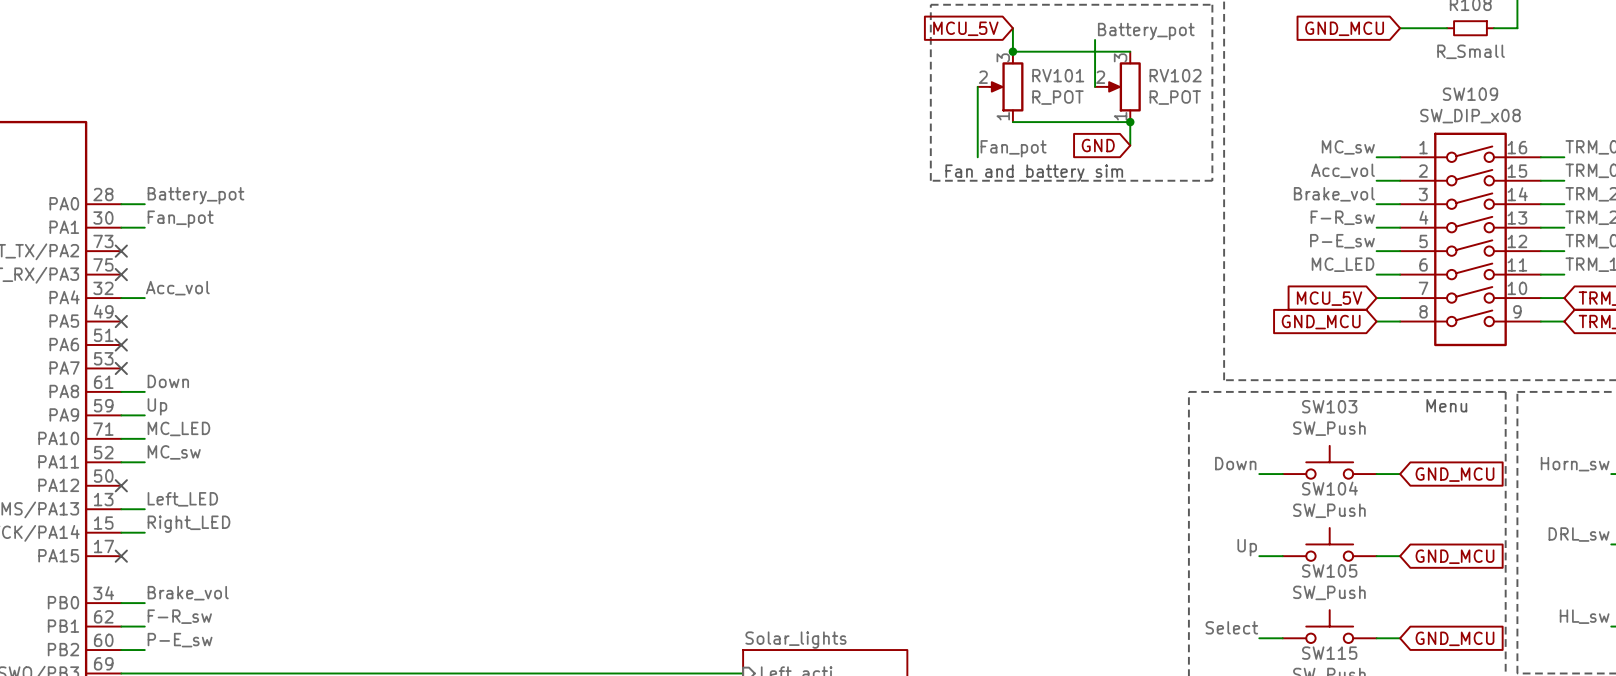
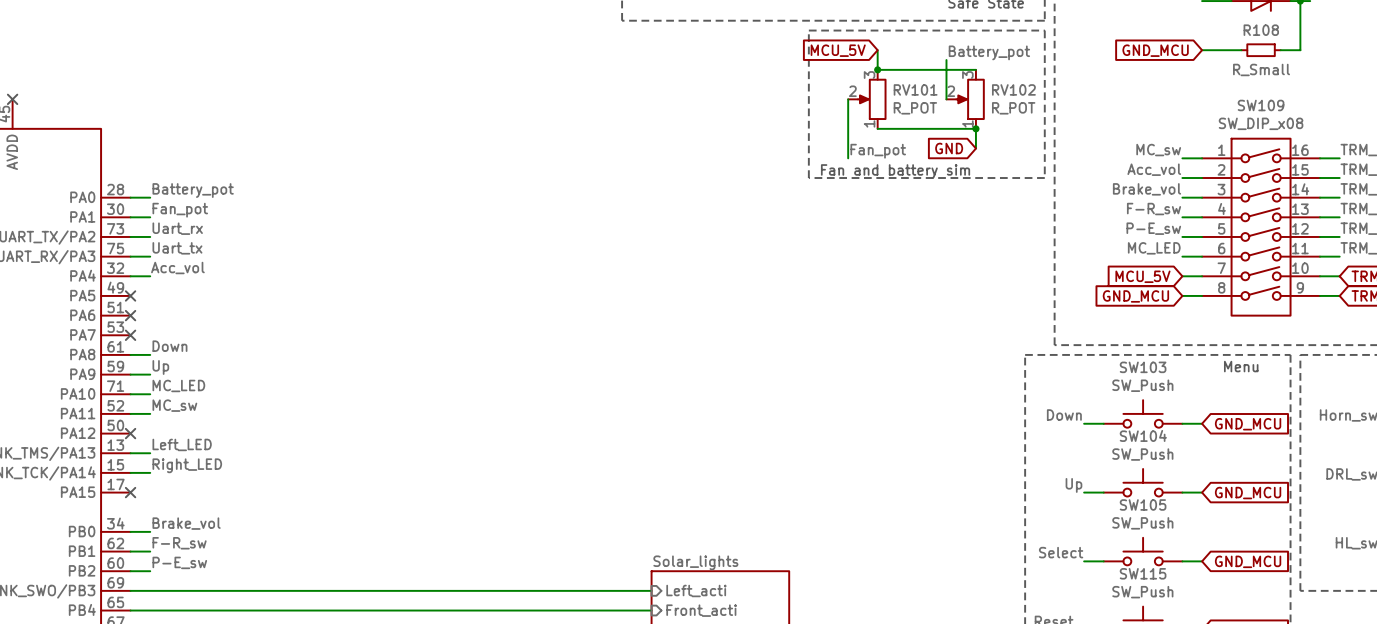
label: none -> Uart_rx (177, 228)
wire: none -> (130, 236) (150, 236)
no-connect mark: (121, 251) -> none
label: none -> Uart_tx (177, 248)
wire: none -> (130, 256) (150, 256)
no-connect mark: (121, 274) -> none

